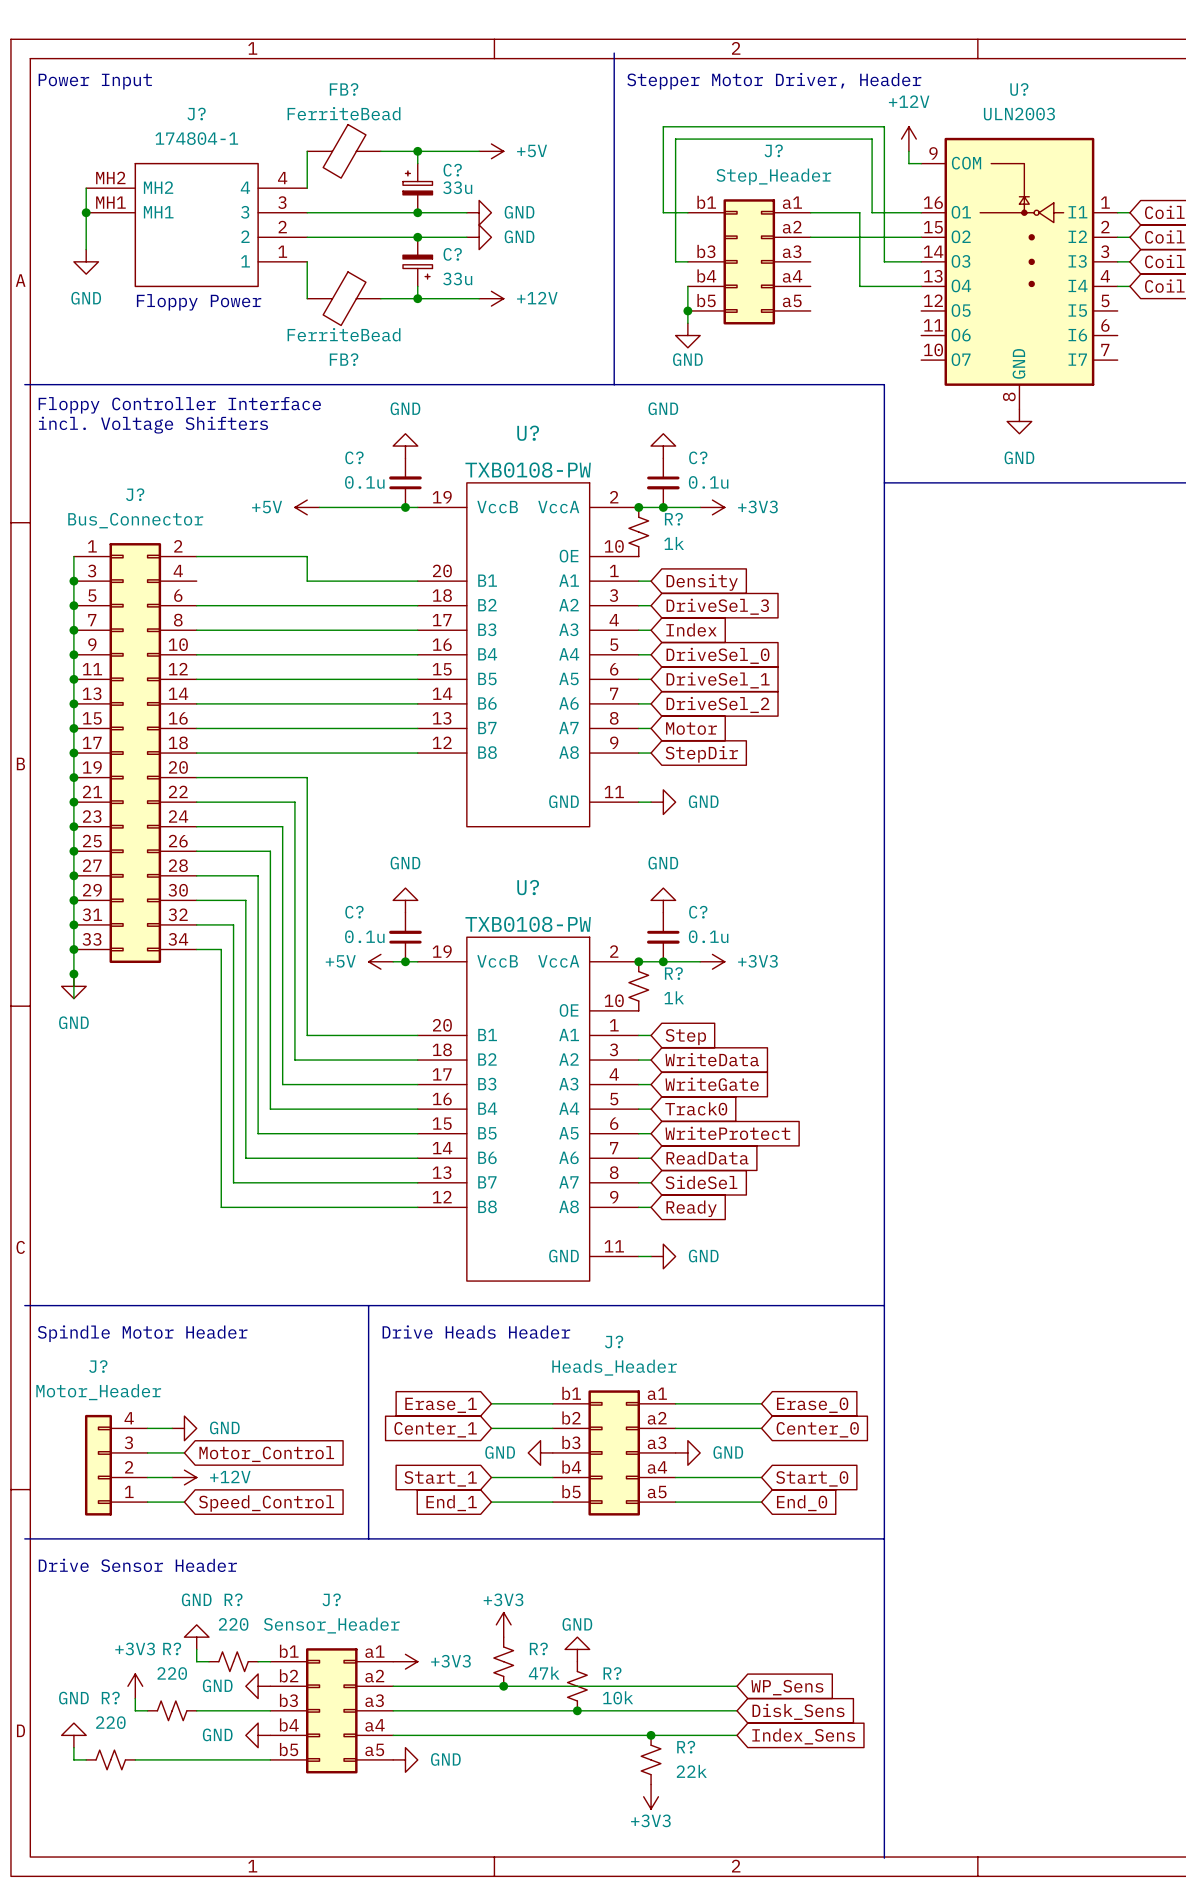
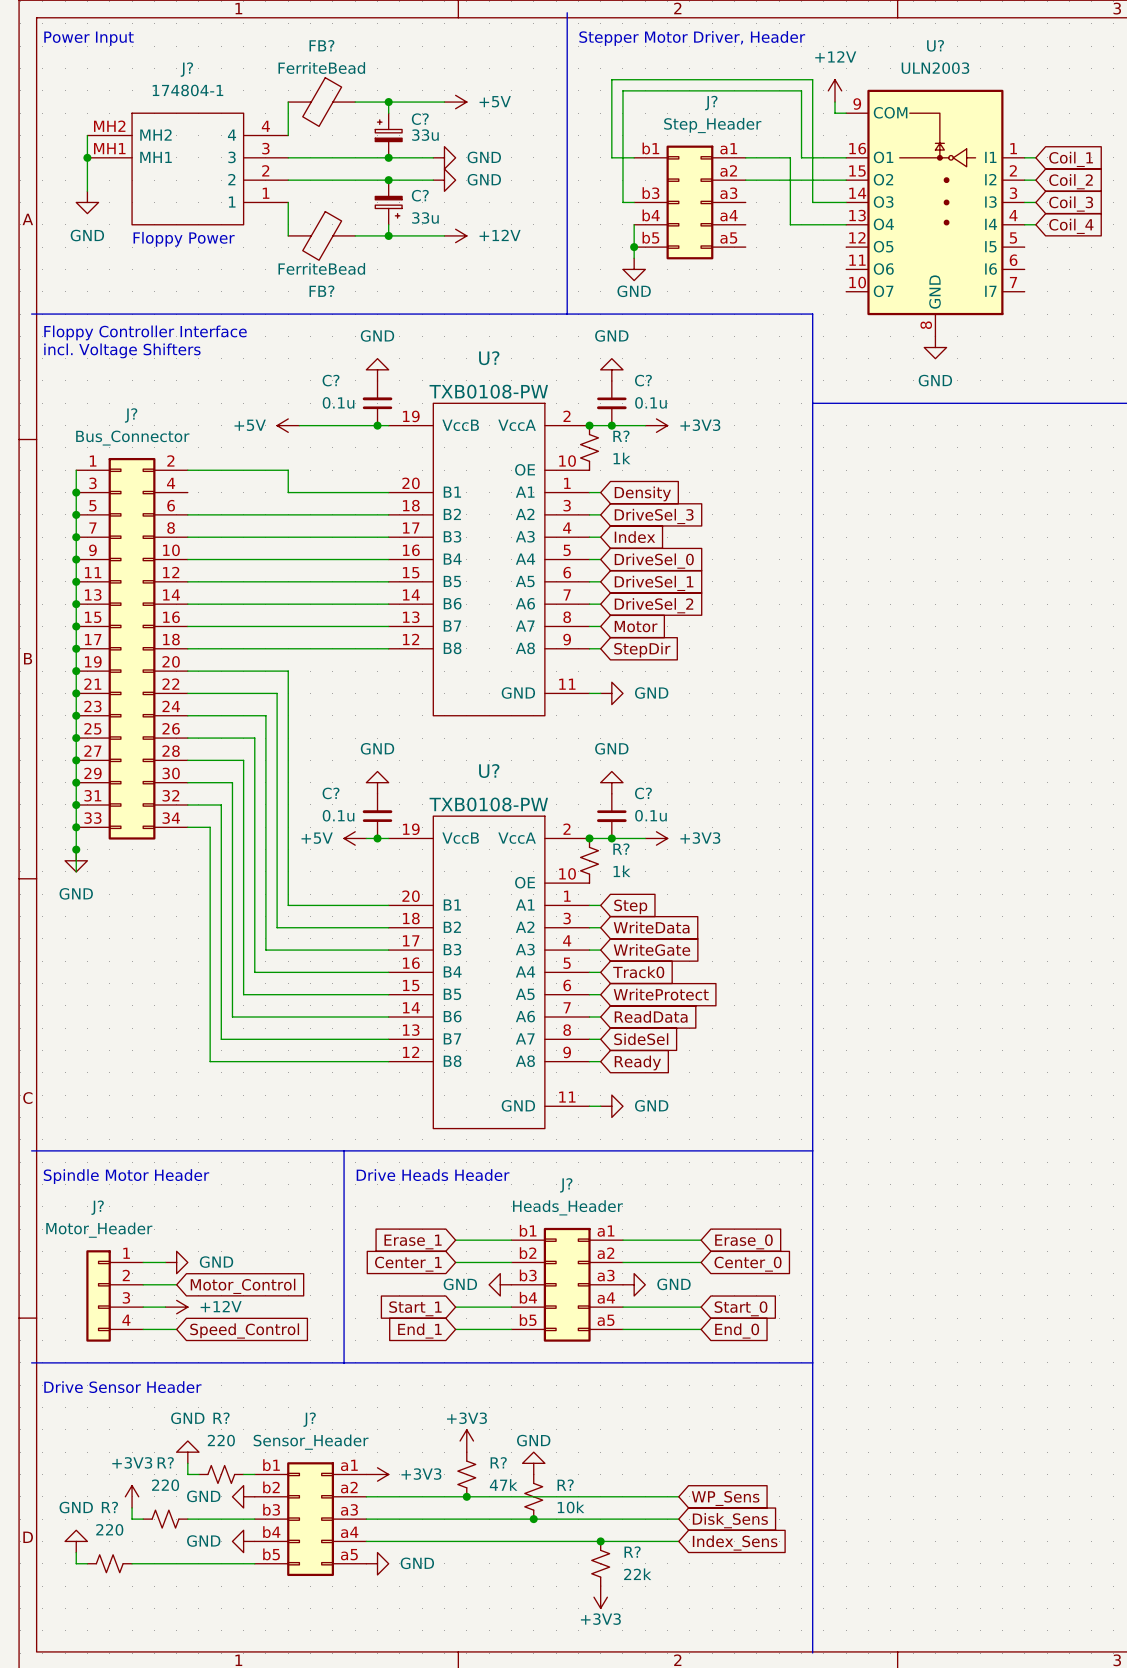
J? flip: as is (98, 1465) -> up-down (98, 1295)

